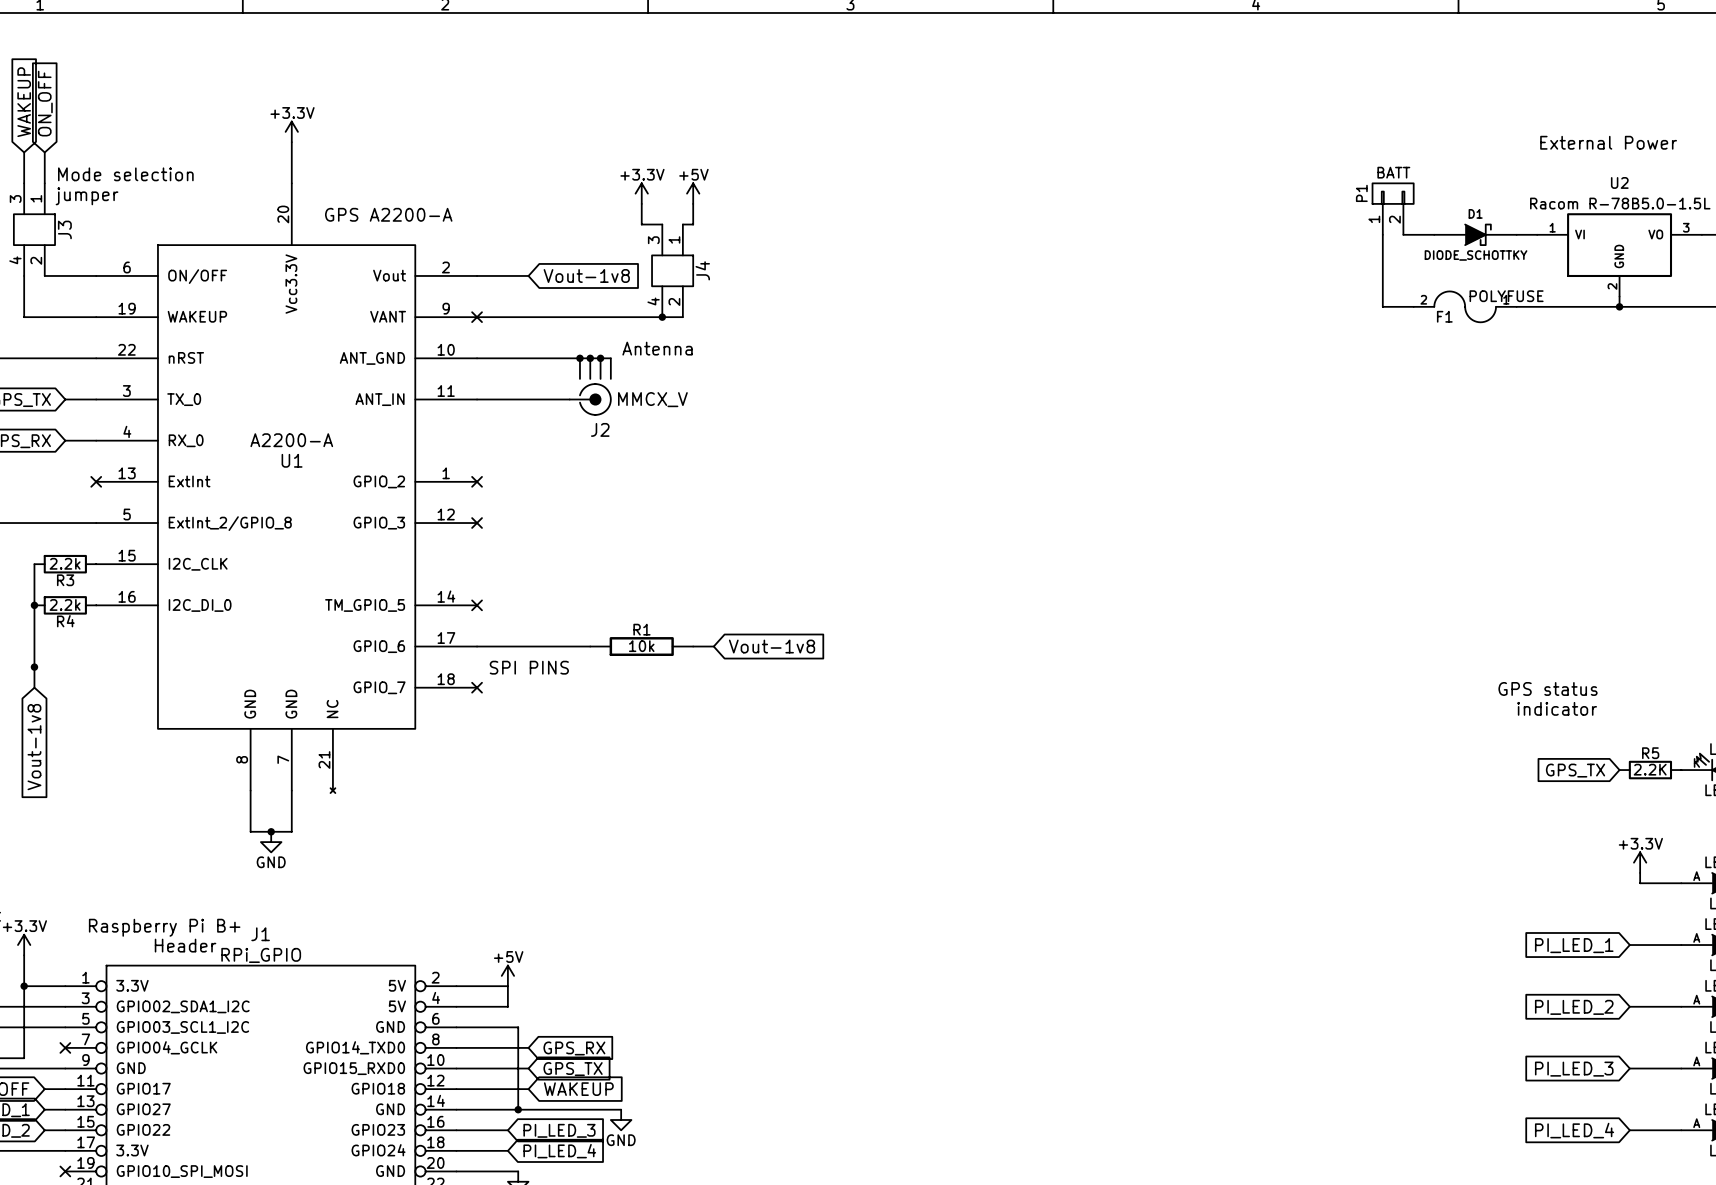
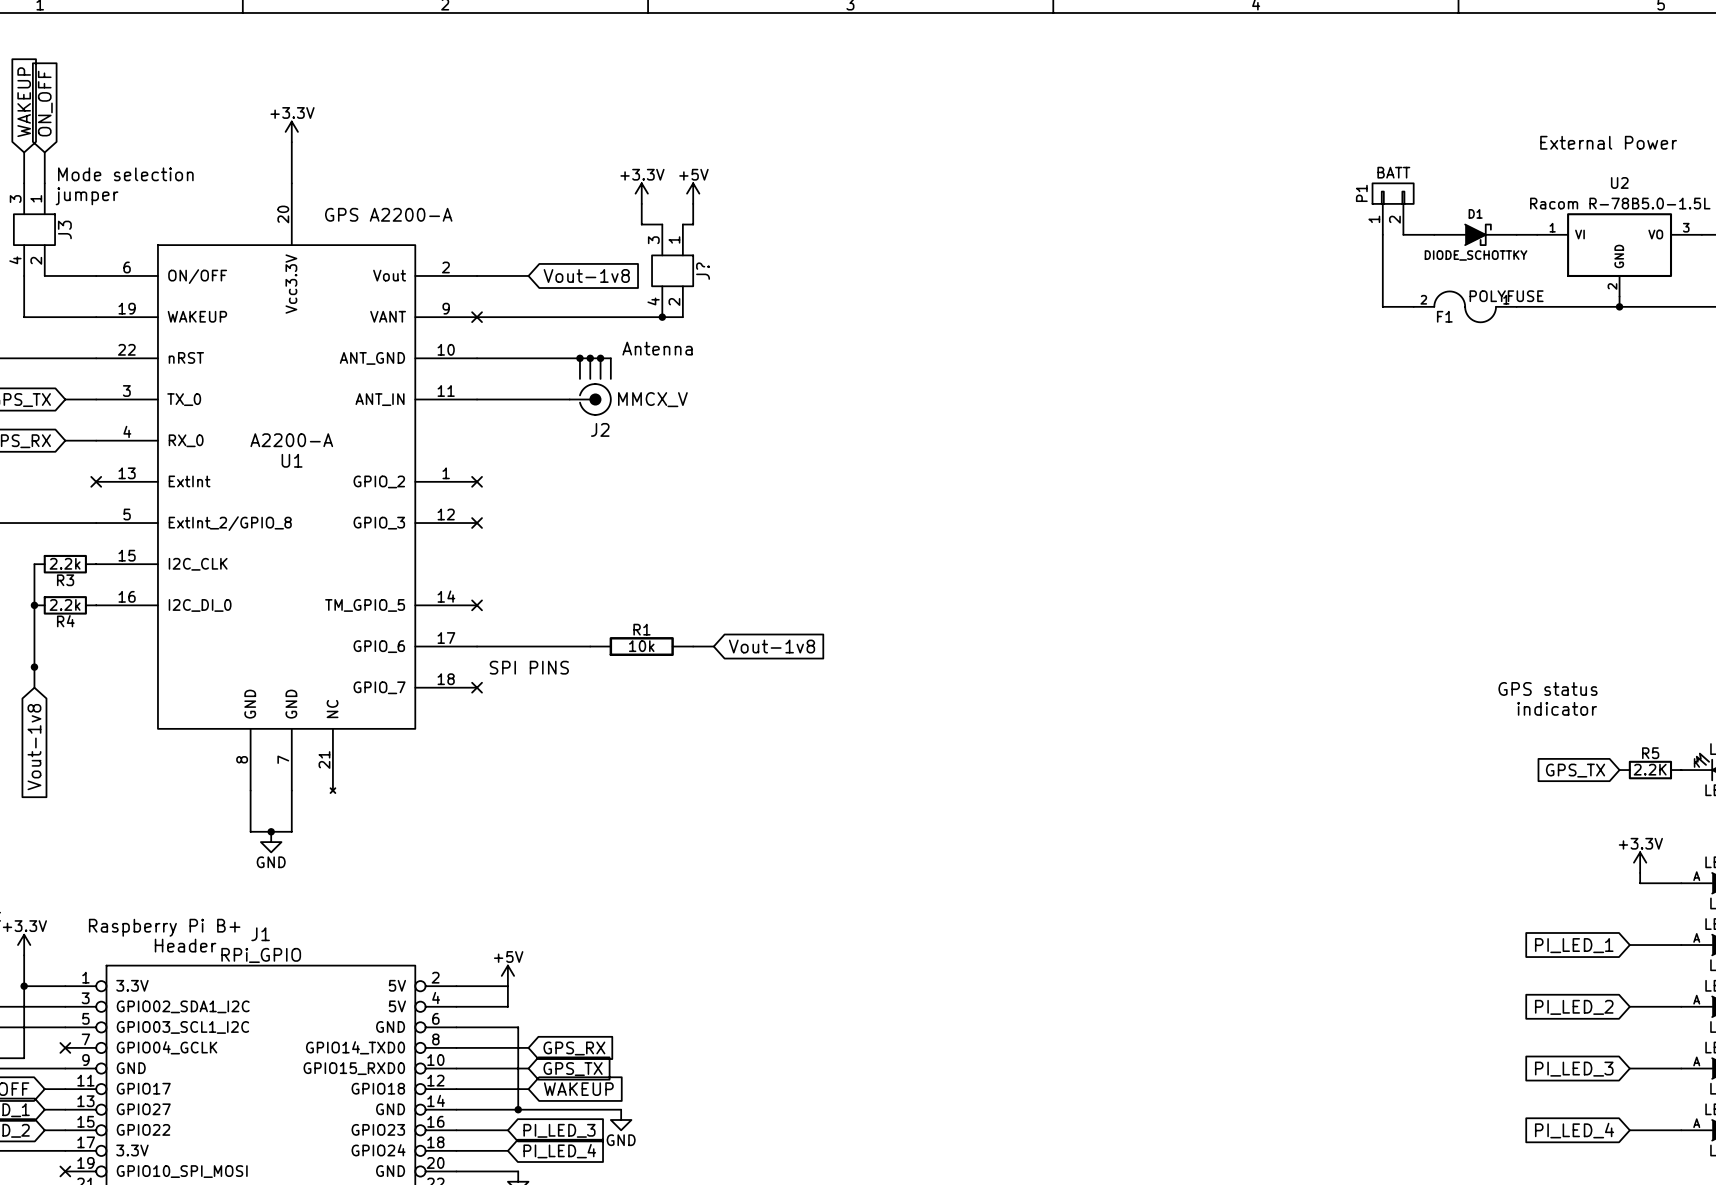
J4 name: J4 (702, 270) -> J? (703, 271)

